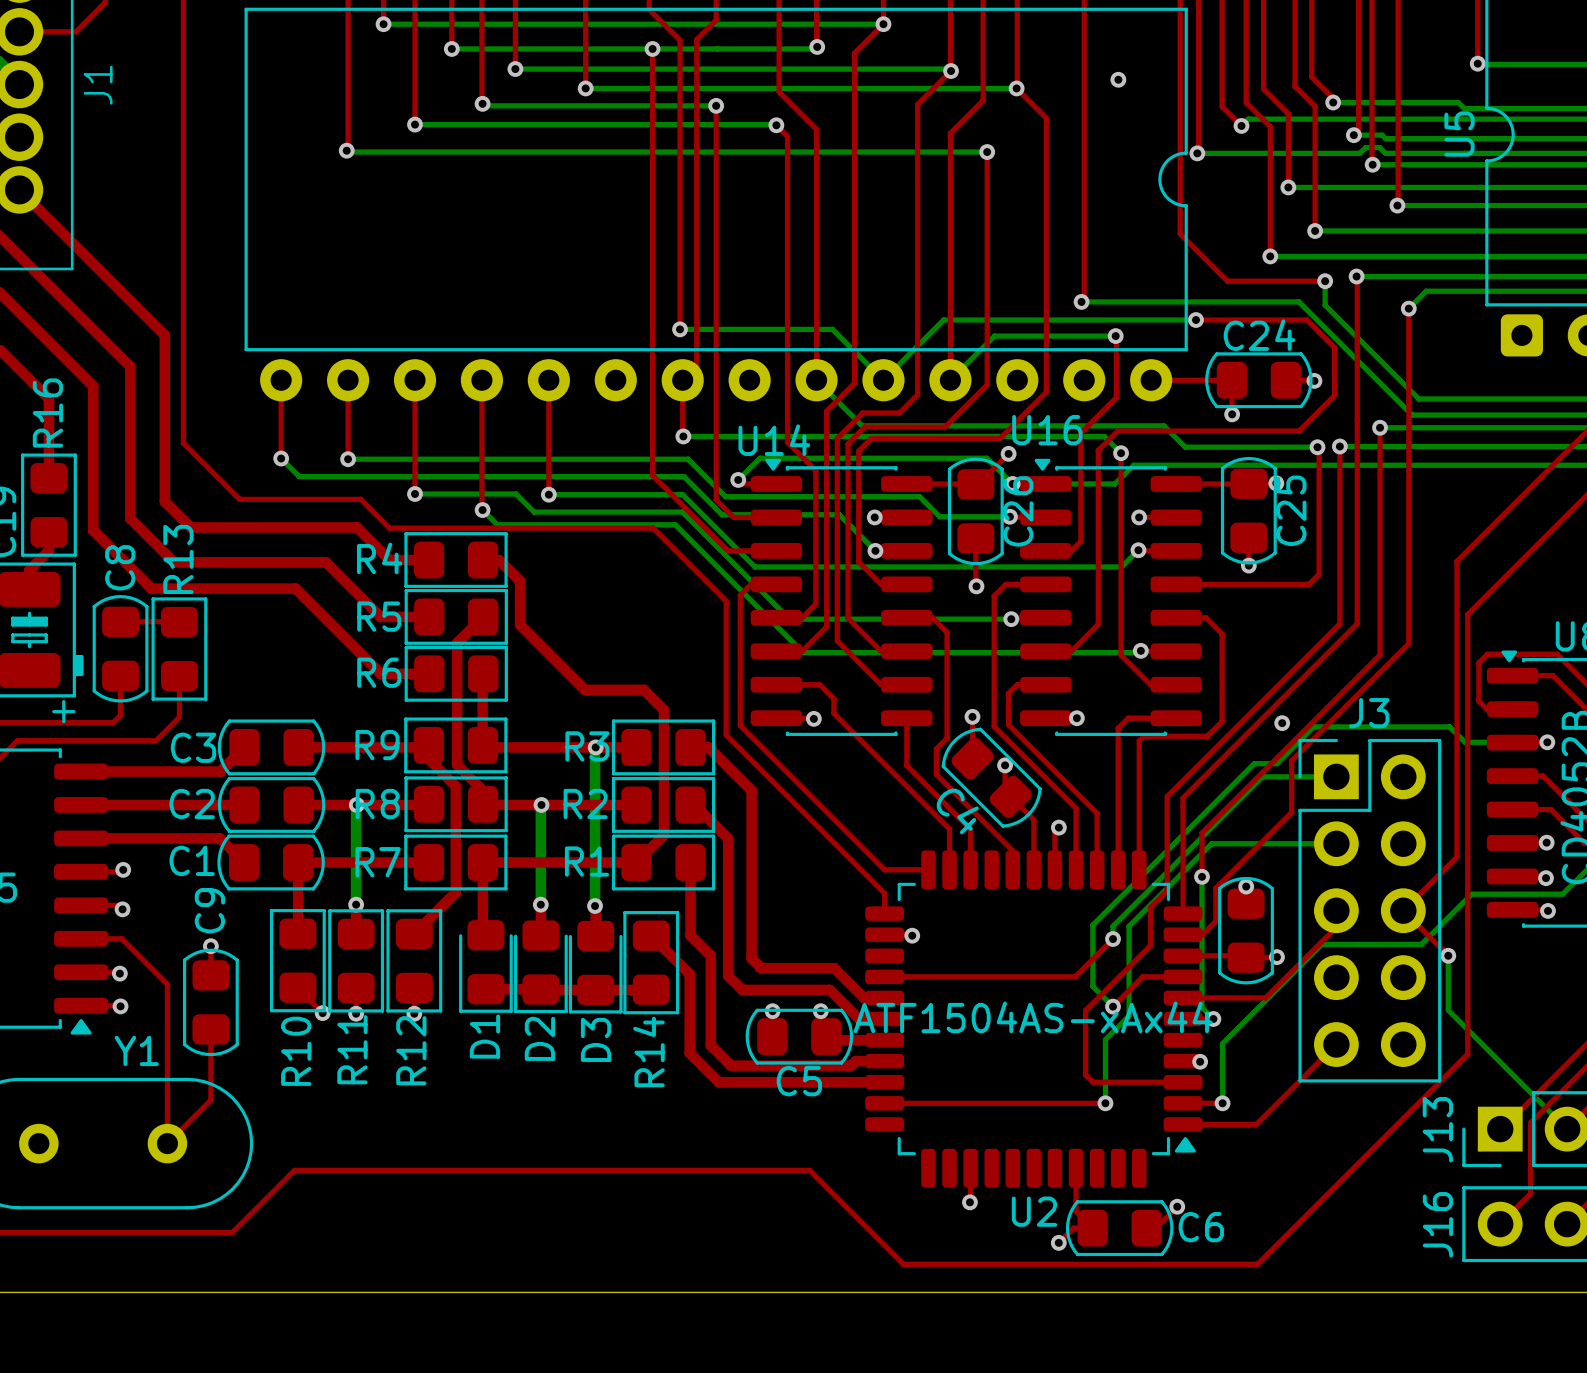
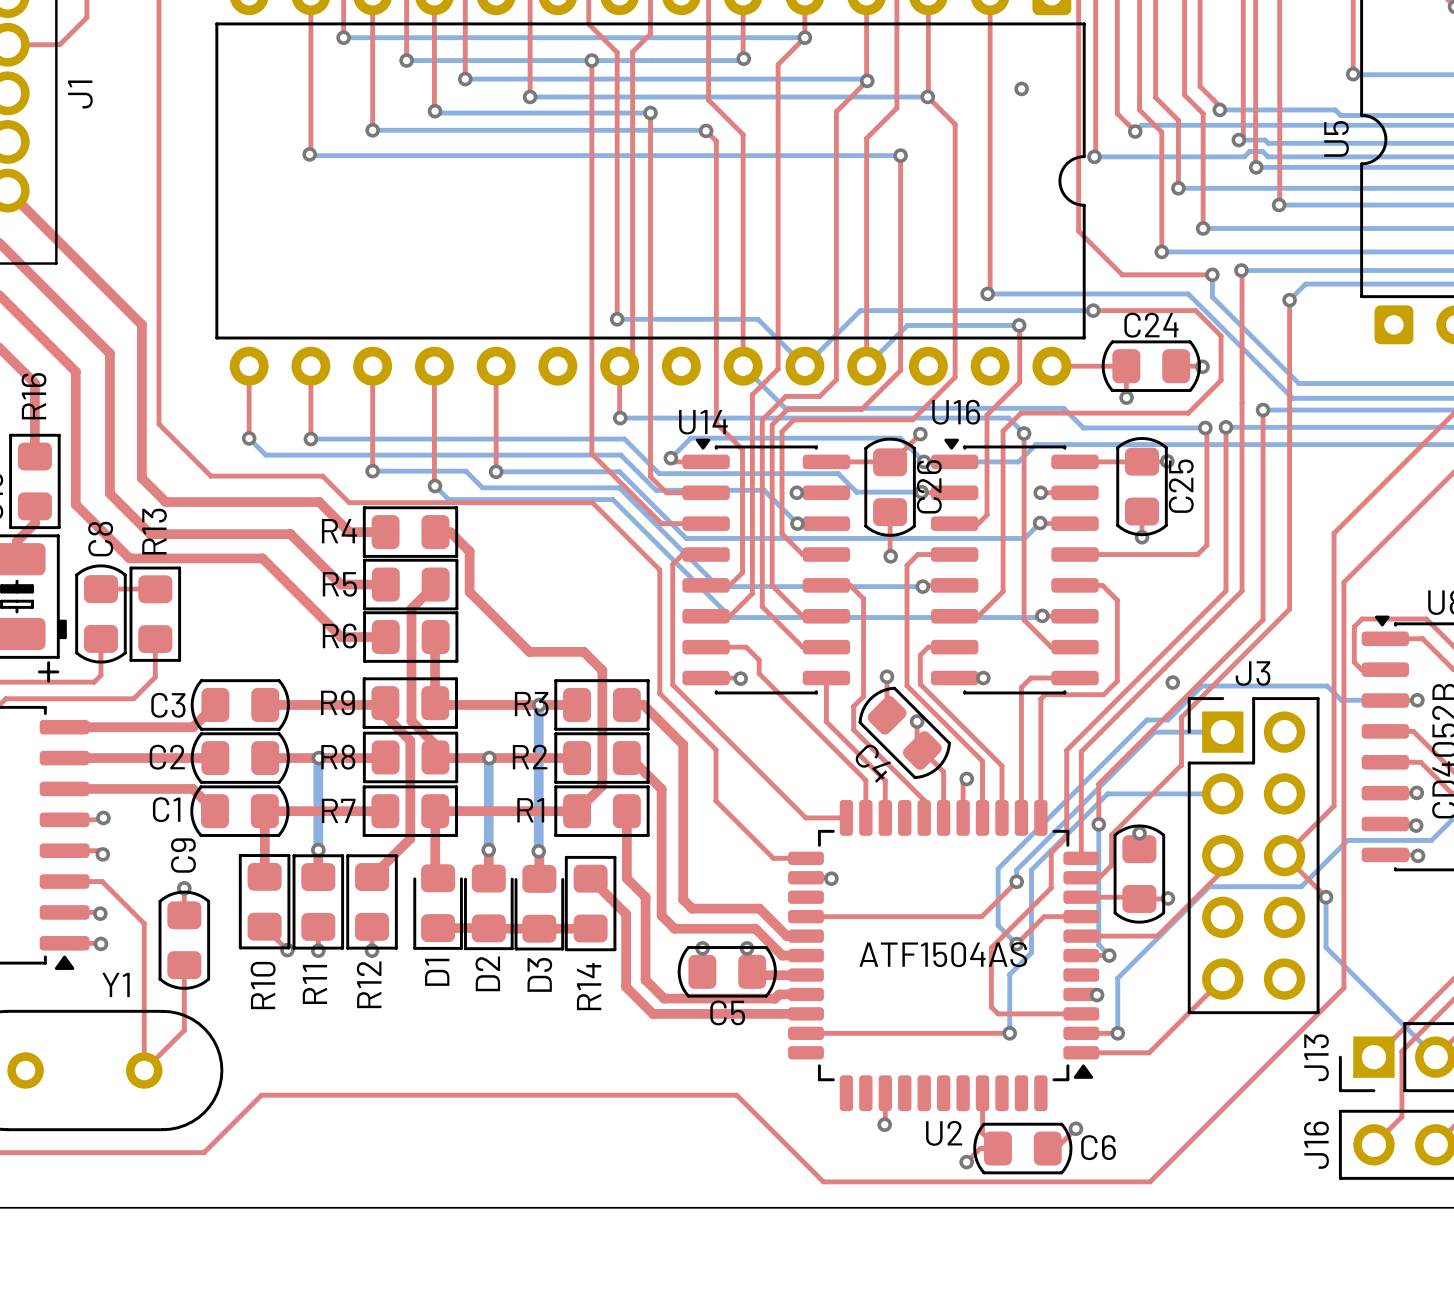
top track: (787, 795) (884, 893) (884, 913) -> (715, 749) (715, 800) (773, 858) (805, 858)
U2 value: ATF1504AS-xAx44 (1033, 1017) -> ATF1504AS (943, 954)

